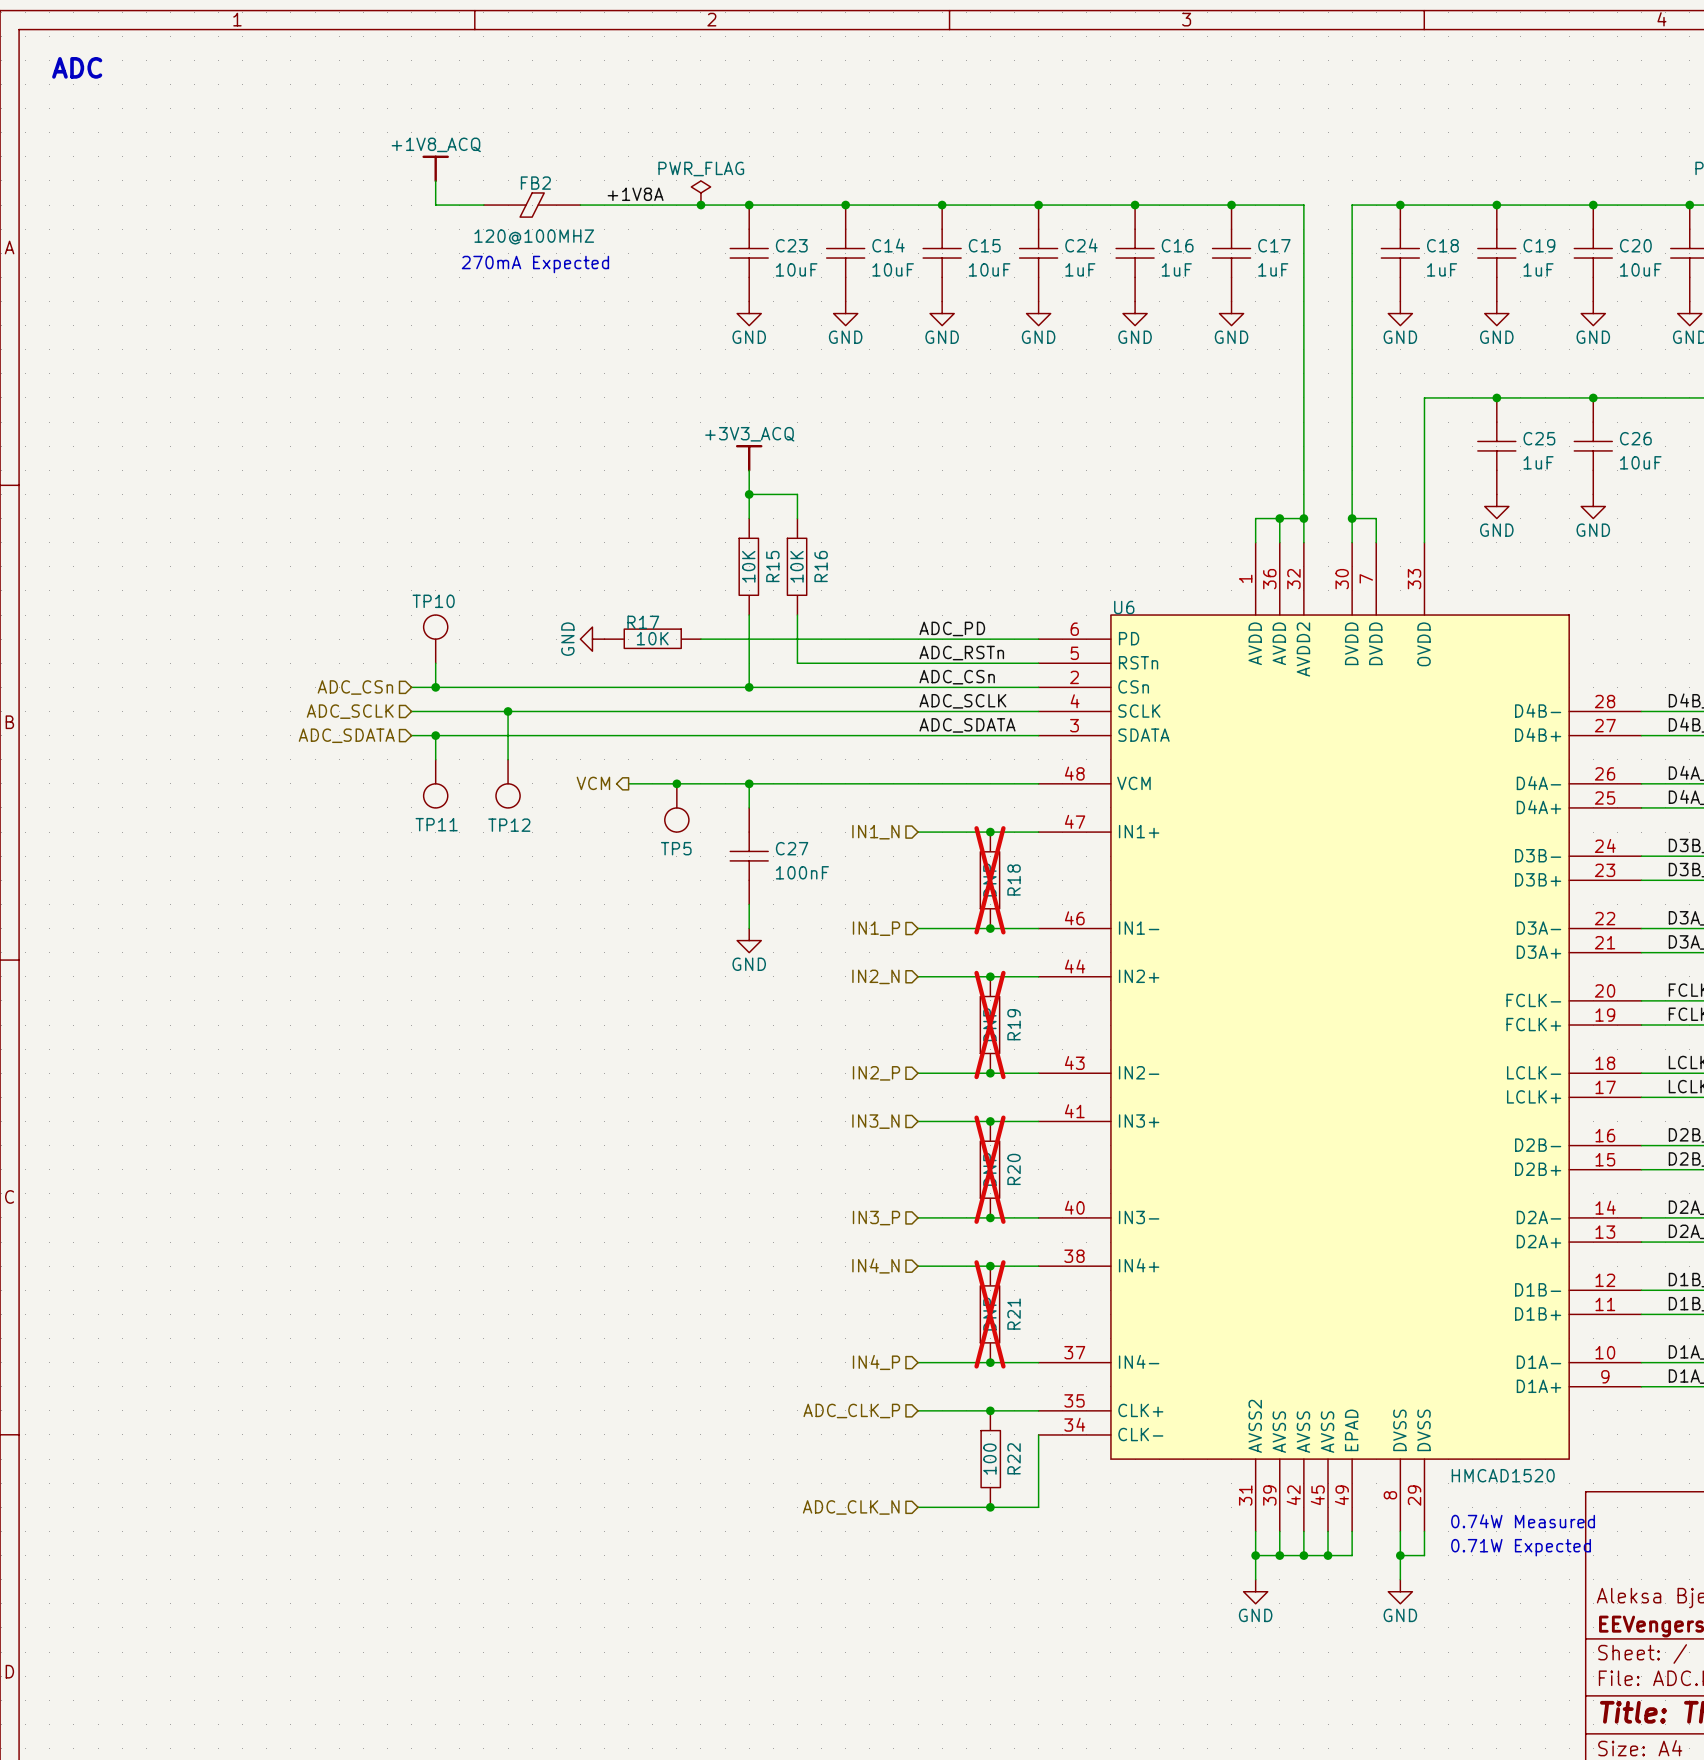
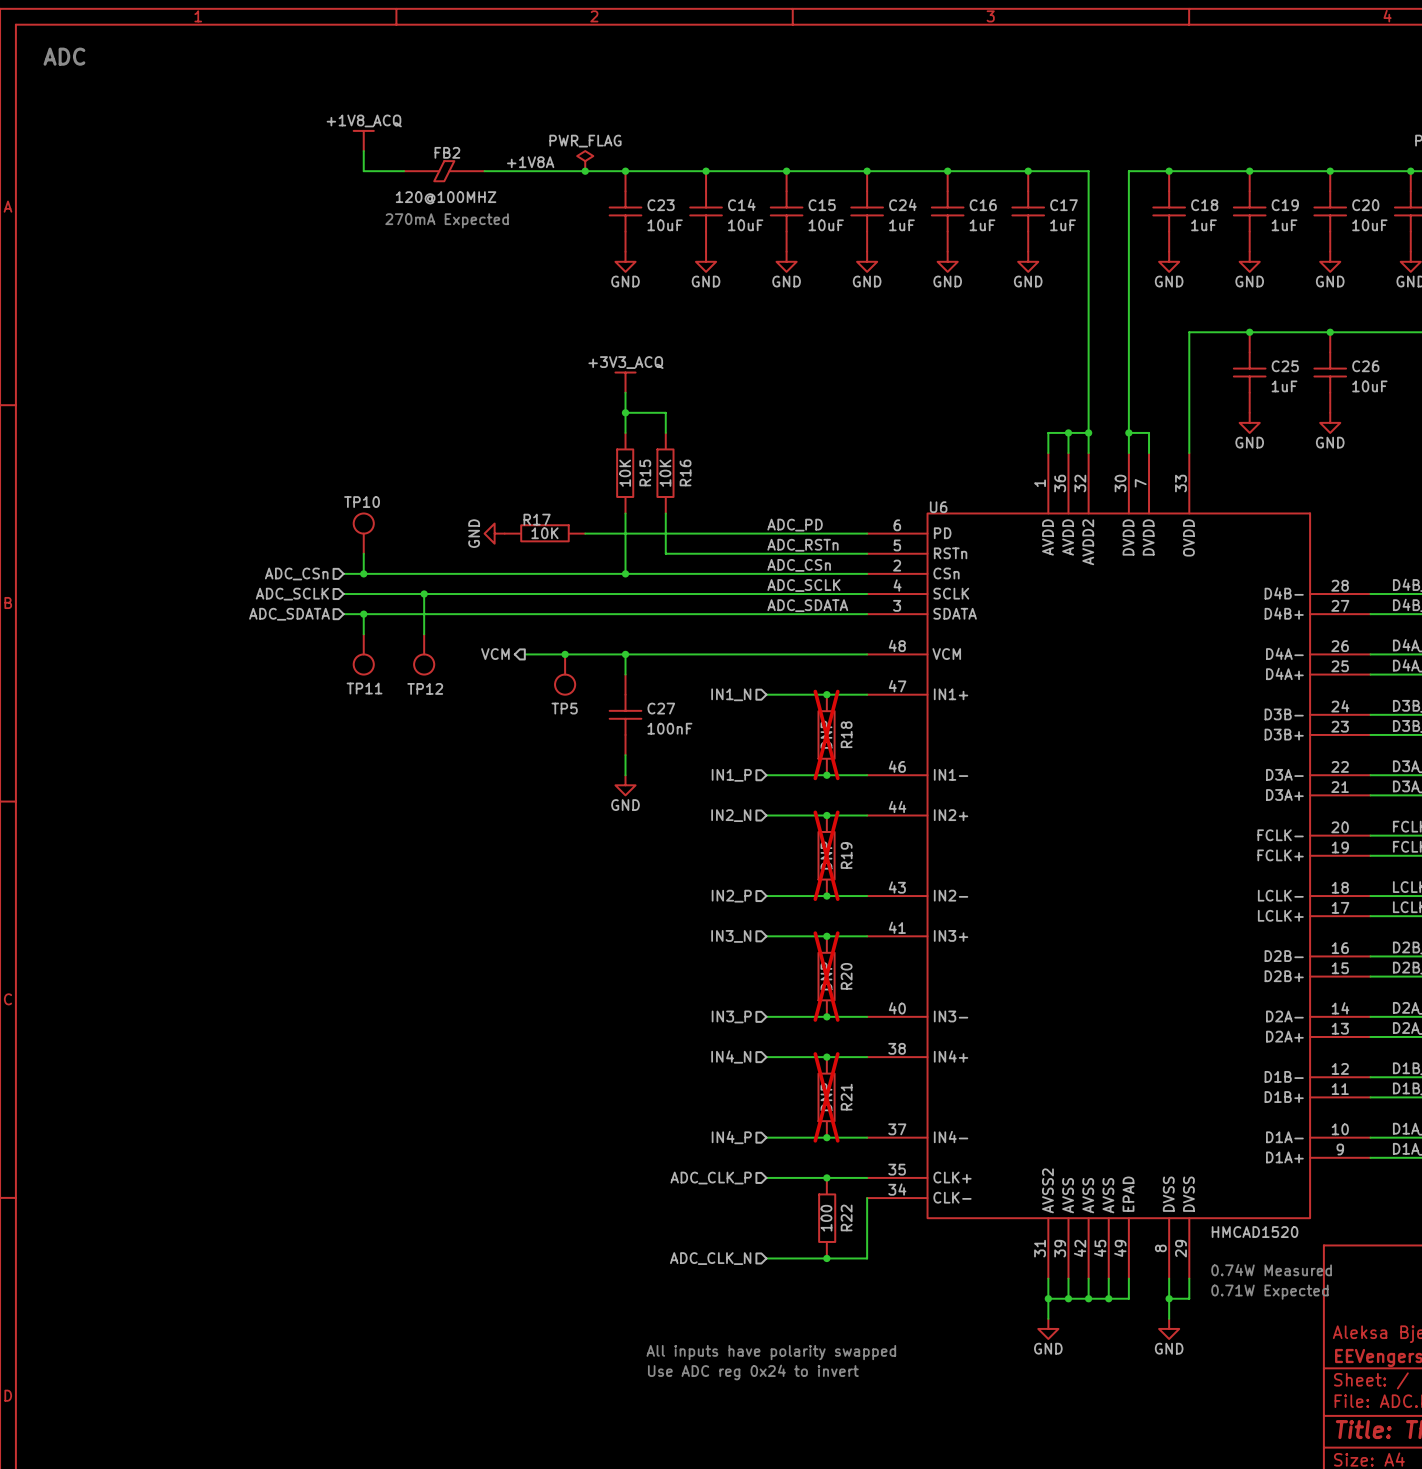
text: none -> All inputs have polarity swapped (771, 1352)
text: none -> Use ADC reg 0x24 to invert (753, 1372)

